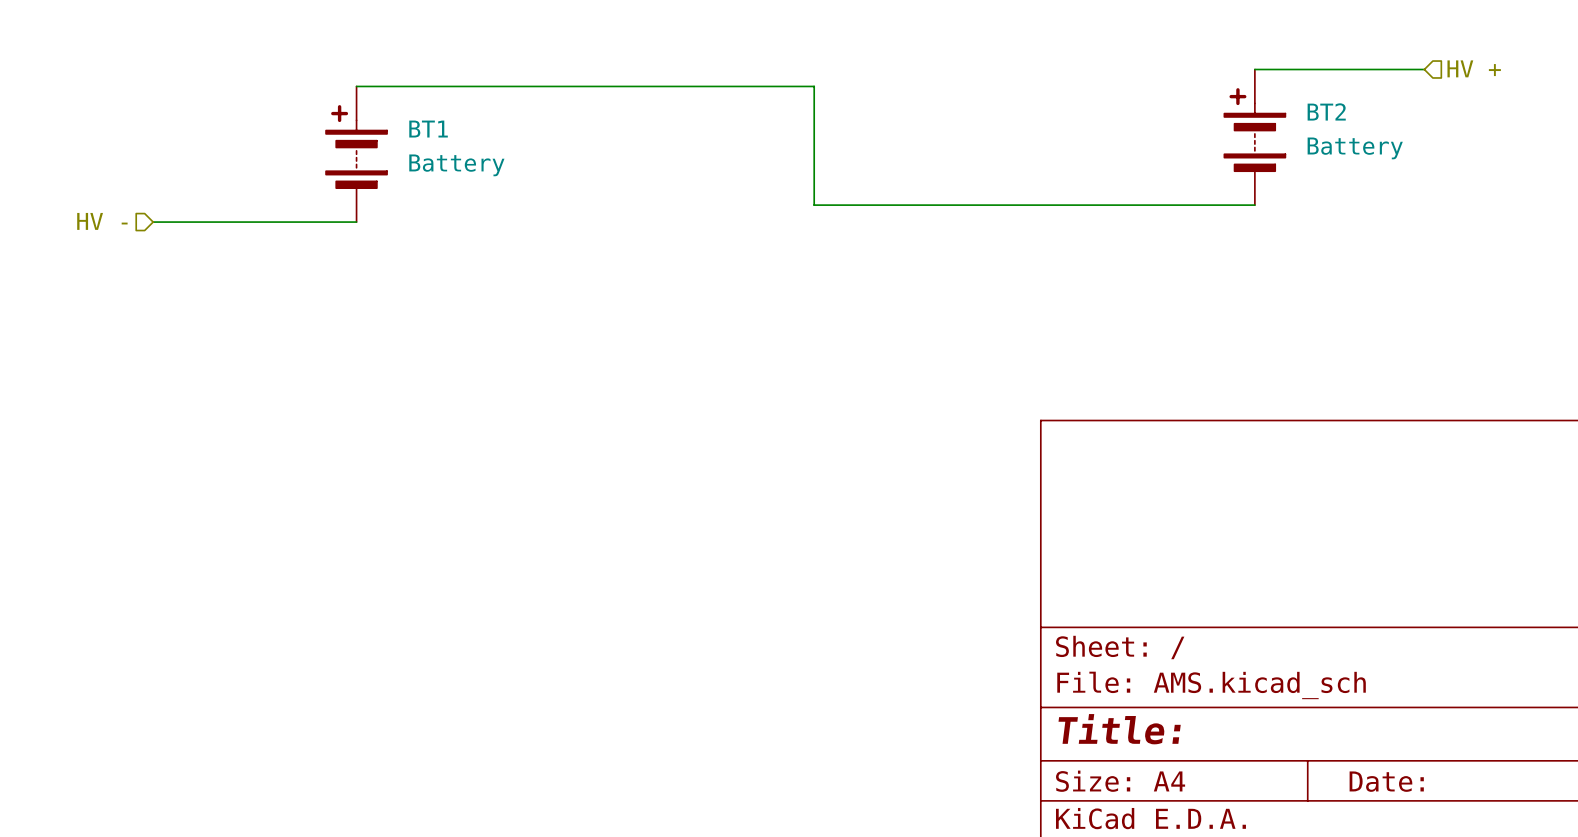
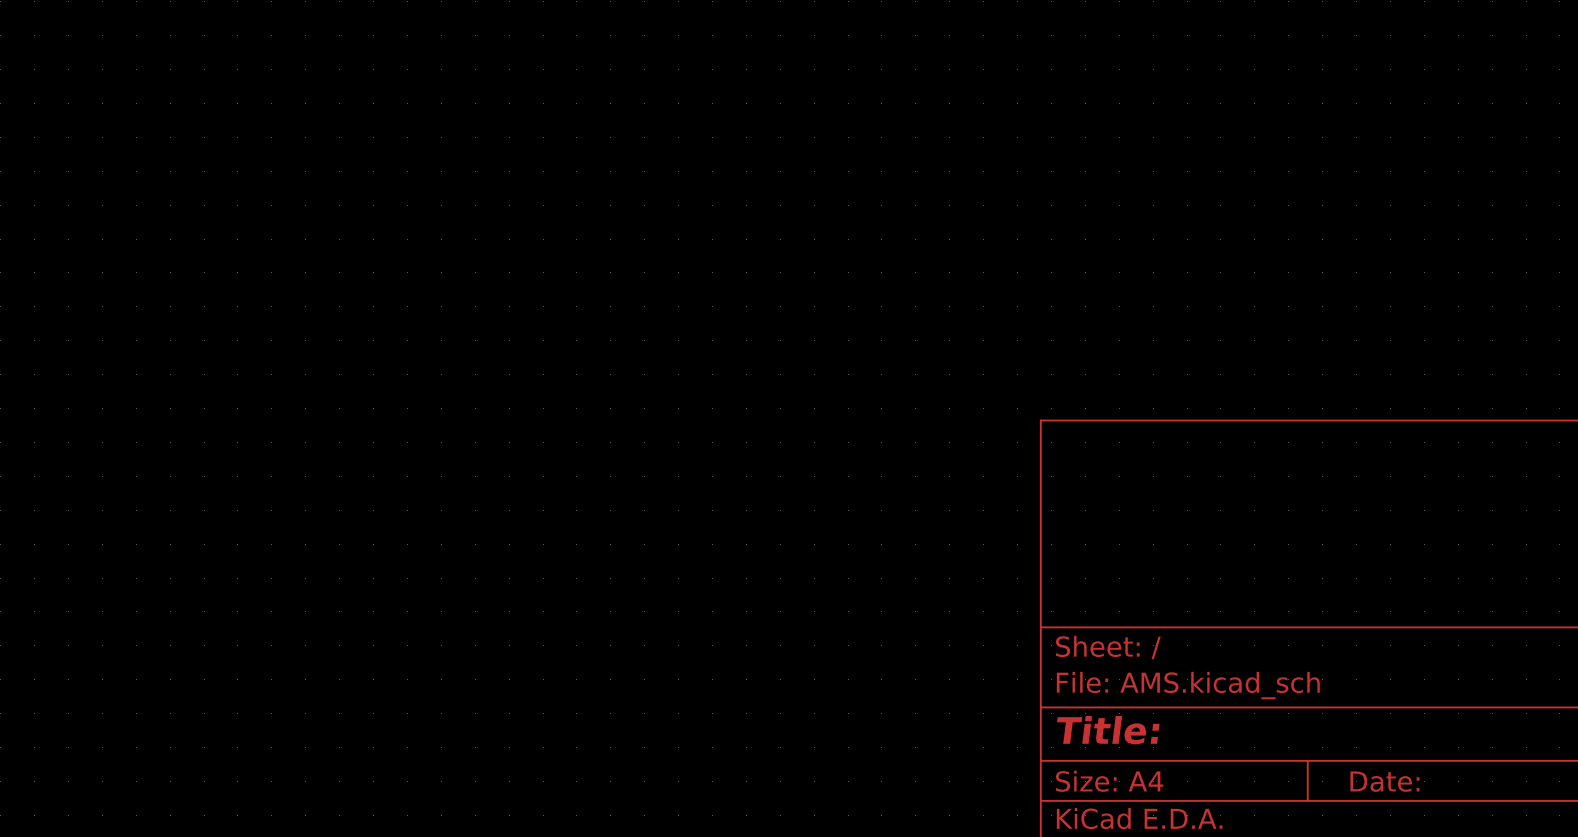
hierarchical label: HV + (1474, 68) -> none
wire: (1254, 69) (1424, 69) -> none
wire: (356, 86) (814, 86) (814, 205) (1254, 205) -> none
BT2: Battery (1254, 137) -> none
BT1: Battery (356, 154) -> none
hierarchical label: HV - (102, 221) -> none
wire: (153, 222) (356, 222) -> none

